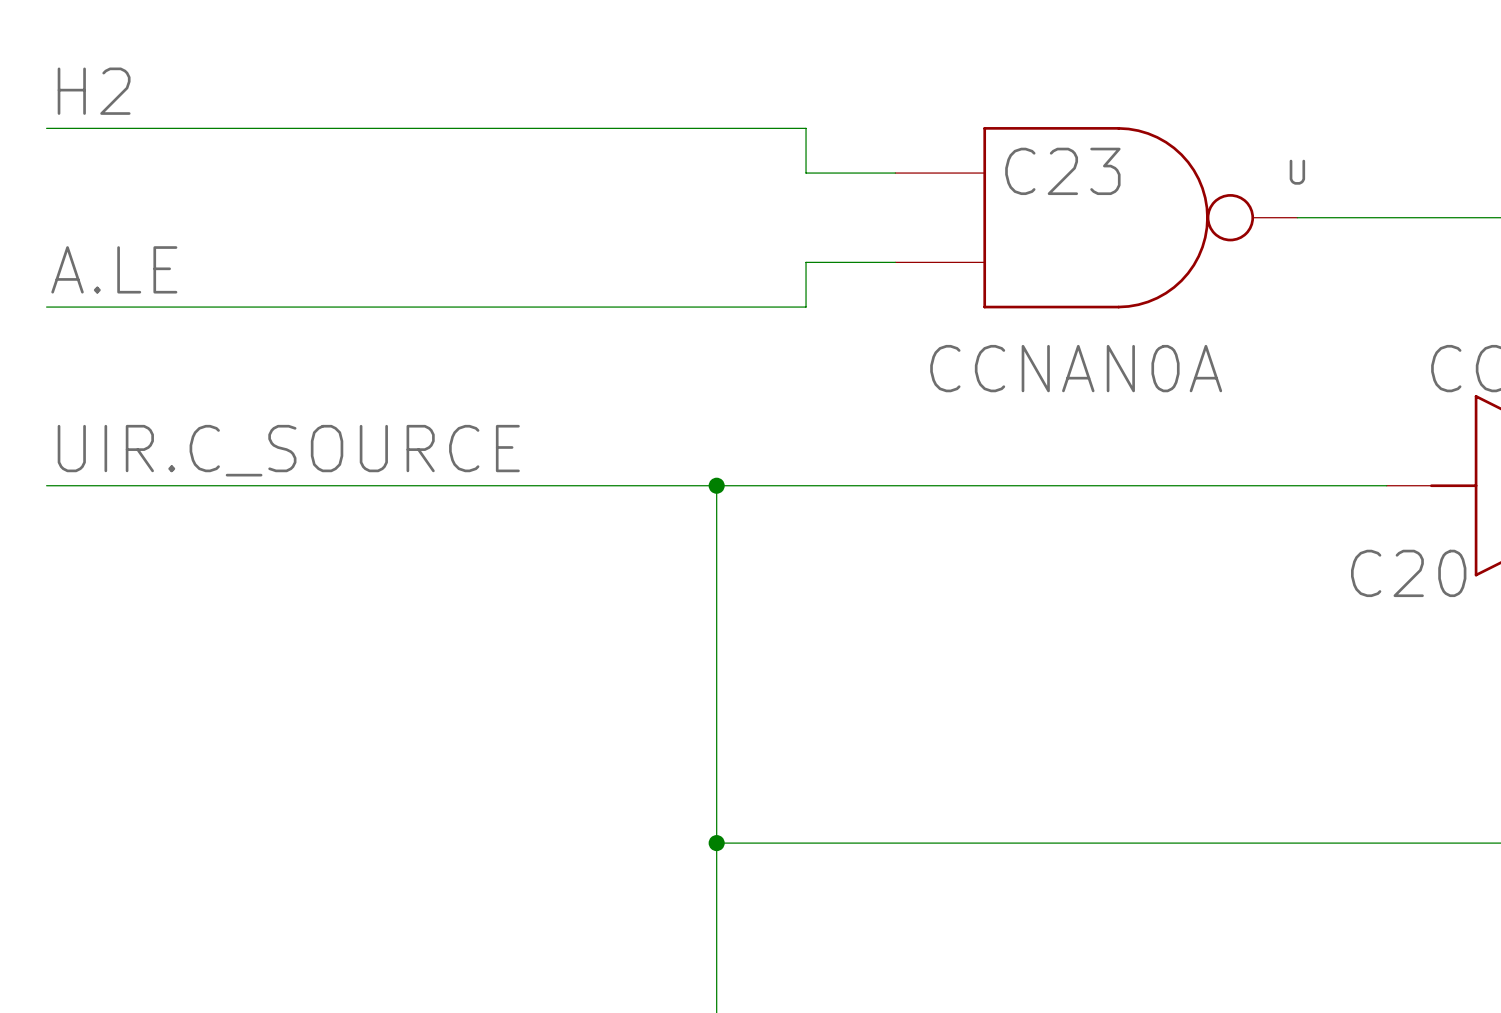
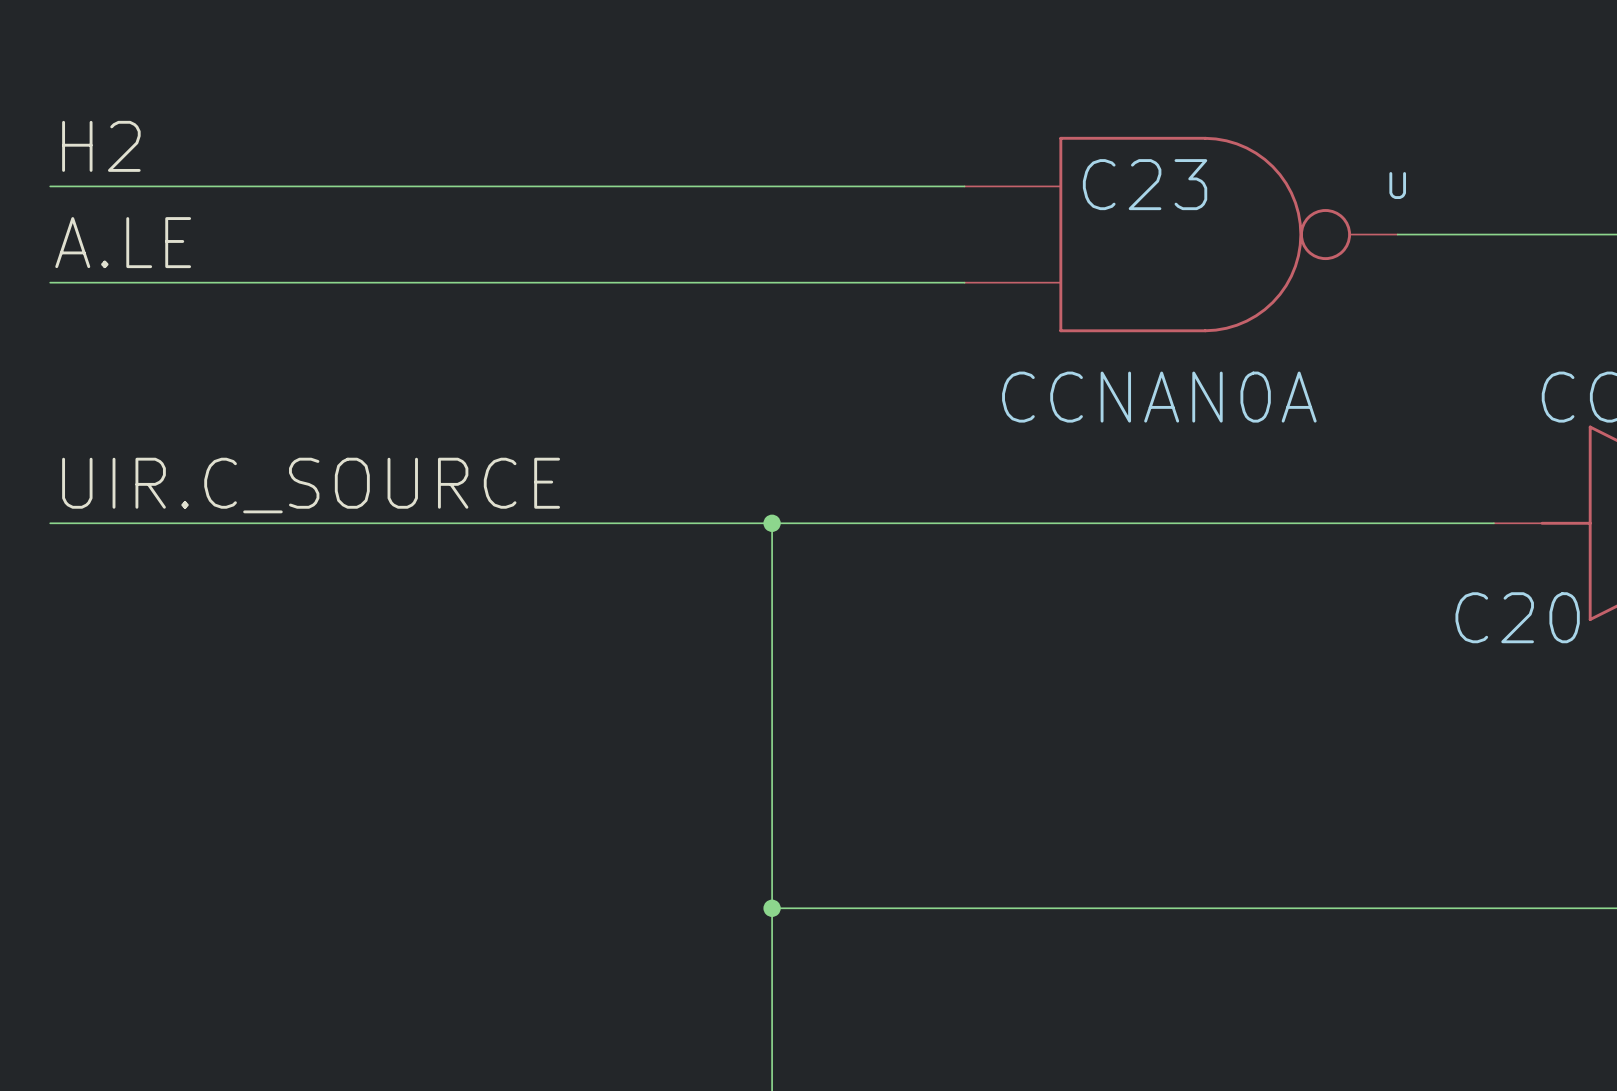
label position: H2 (94, 91) -> H2 (101, 146)
wire: (46, 128) (806, 128) (806, 173) -> (50, 186) (868, 186)
wire: (806, 262) (806, 307) (46, 307) -> (868, 282) (50, 282)
label position: A.LE (114, 269) -> A.LE (123, 242)

